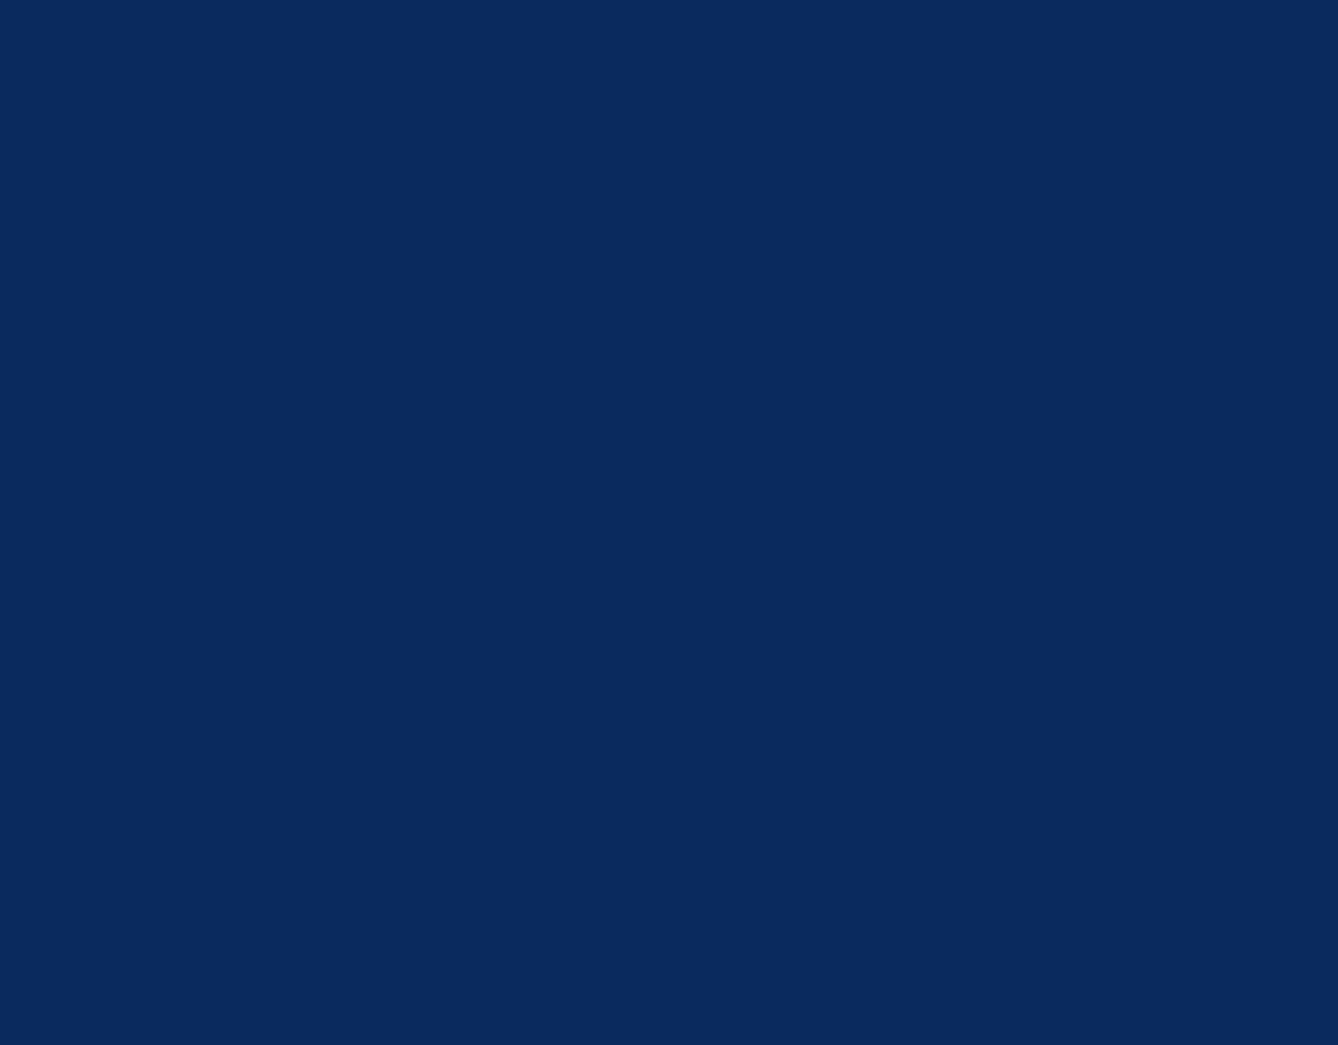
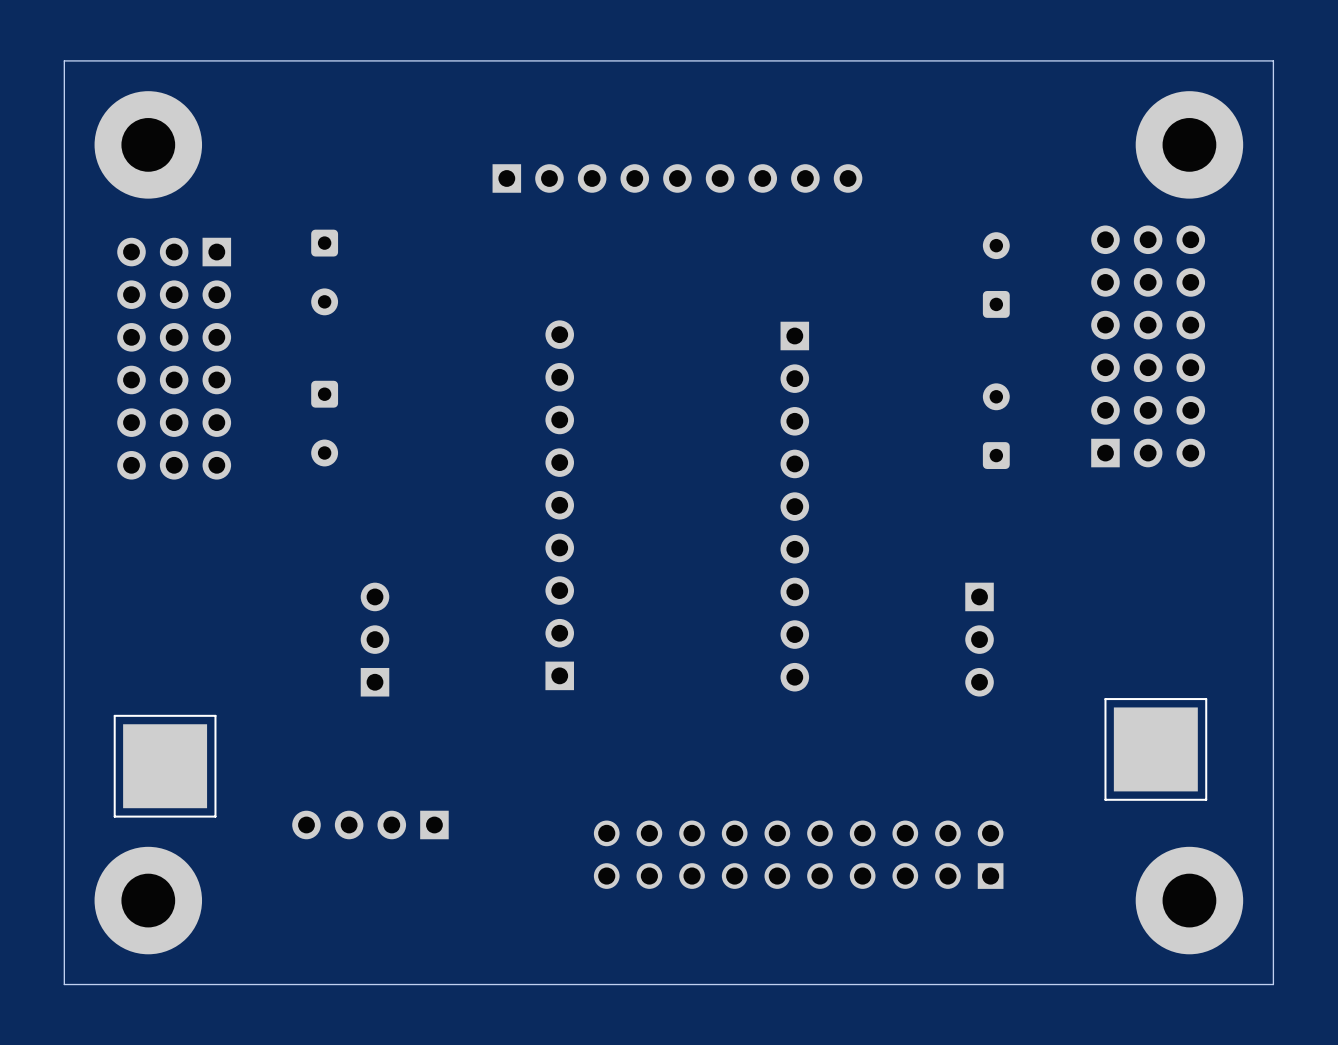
board edge: none -> (1273, 60) (64, 60) (64, 984) (1273, 984) (1273, 60)
part: none -> (148, 144)
part: none -> (1189, 144)
part: none -> (677, 178)
part: none -> (324, 272)
part: none -> (996, 275)
part: none -> (1148, 346)
part: none -> (174, 358)
part: none -> (324, 423)
part: none -> (996, 426)
part: none -> (559, 505)
part: none -> (794, 506)
part: none -> (375, 639)
part: none -> (979, 639)
part: none -> (1155, 749)
part: none -> (165, 766)
part: none -> (370, 824)
part: none -> (798, 854)
part: none -> (148, 900)
part: none -> (1189, 900)

